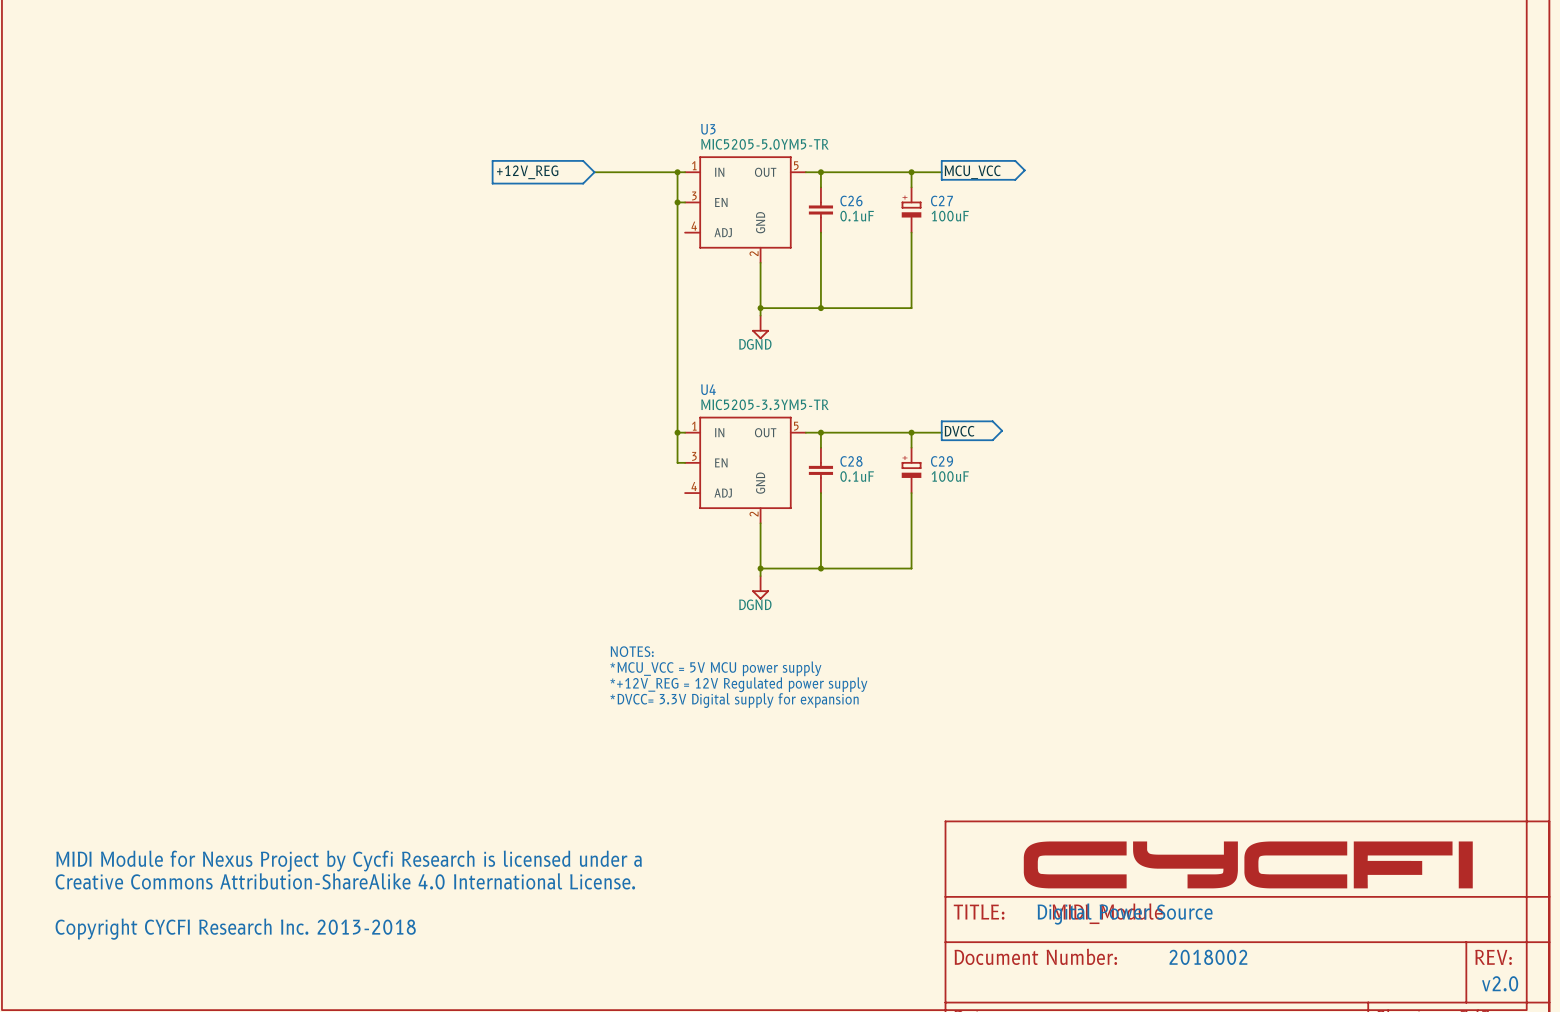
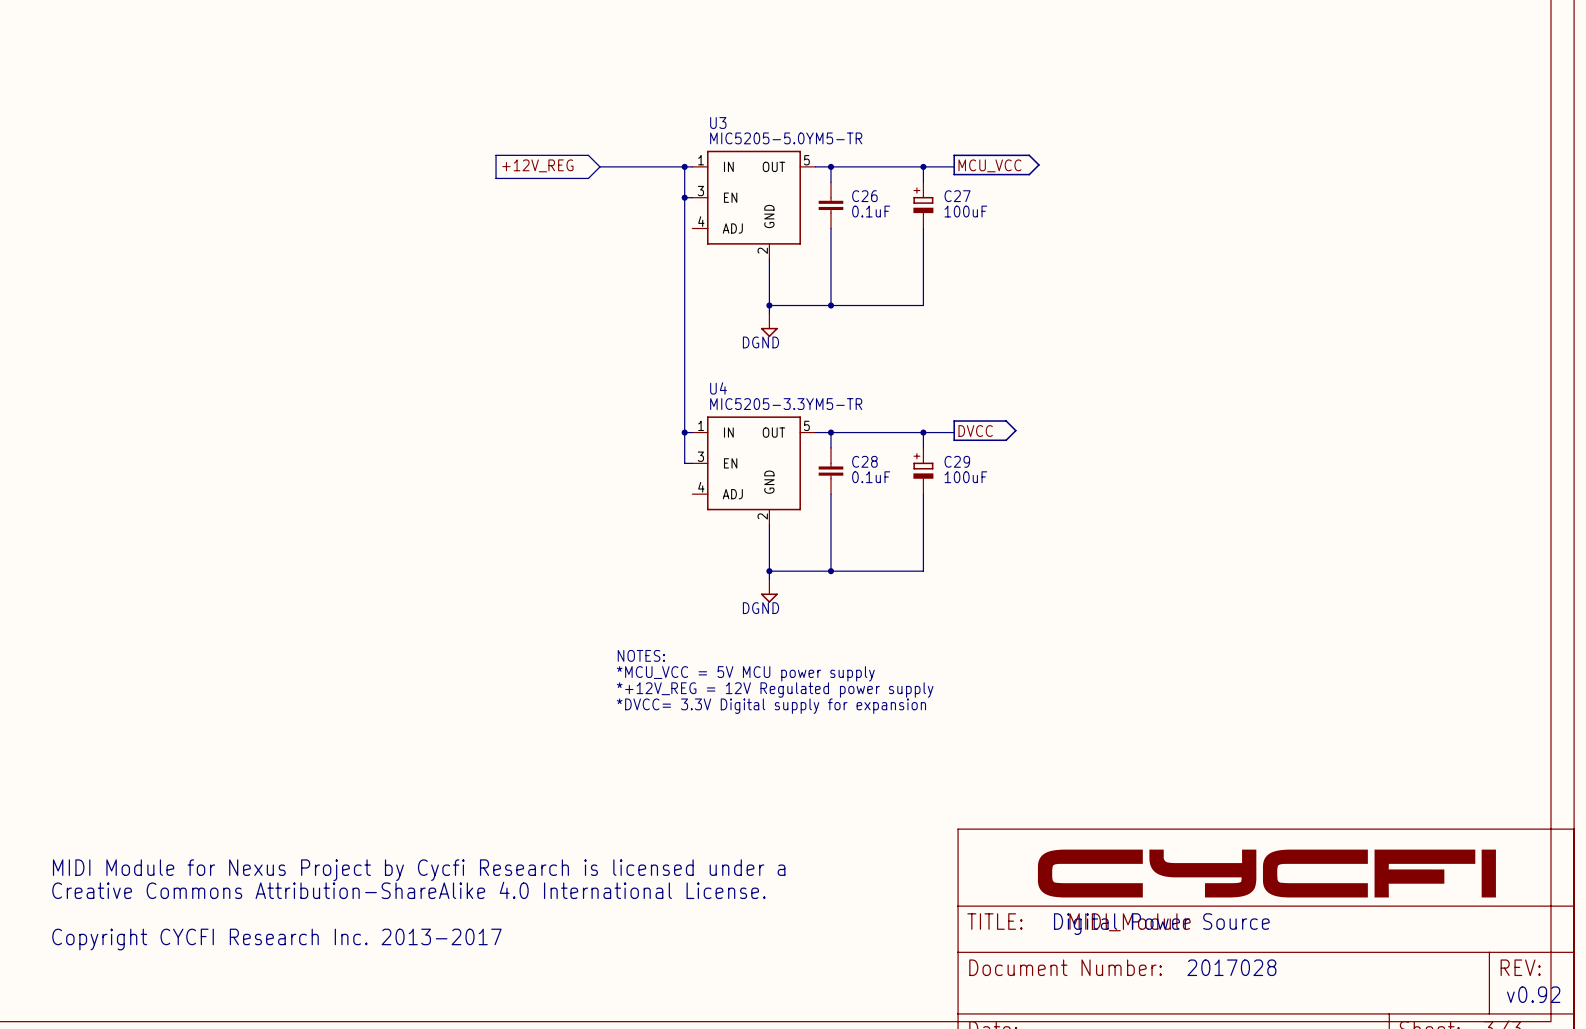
text: Copyright CYCFI Research Inc. 2013-2018 (235, 929) -> Copyright CYCFI Research Inc. 2013-2017 (276, 939)
text: 2018002 (1208, 957) -> 2017028 (1231, 967)
text: v2.0 (1500, 983) -> v0.92 (1533, 994)

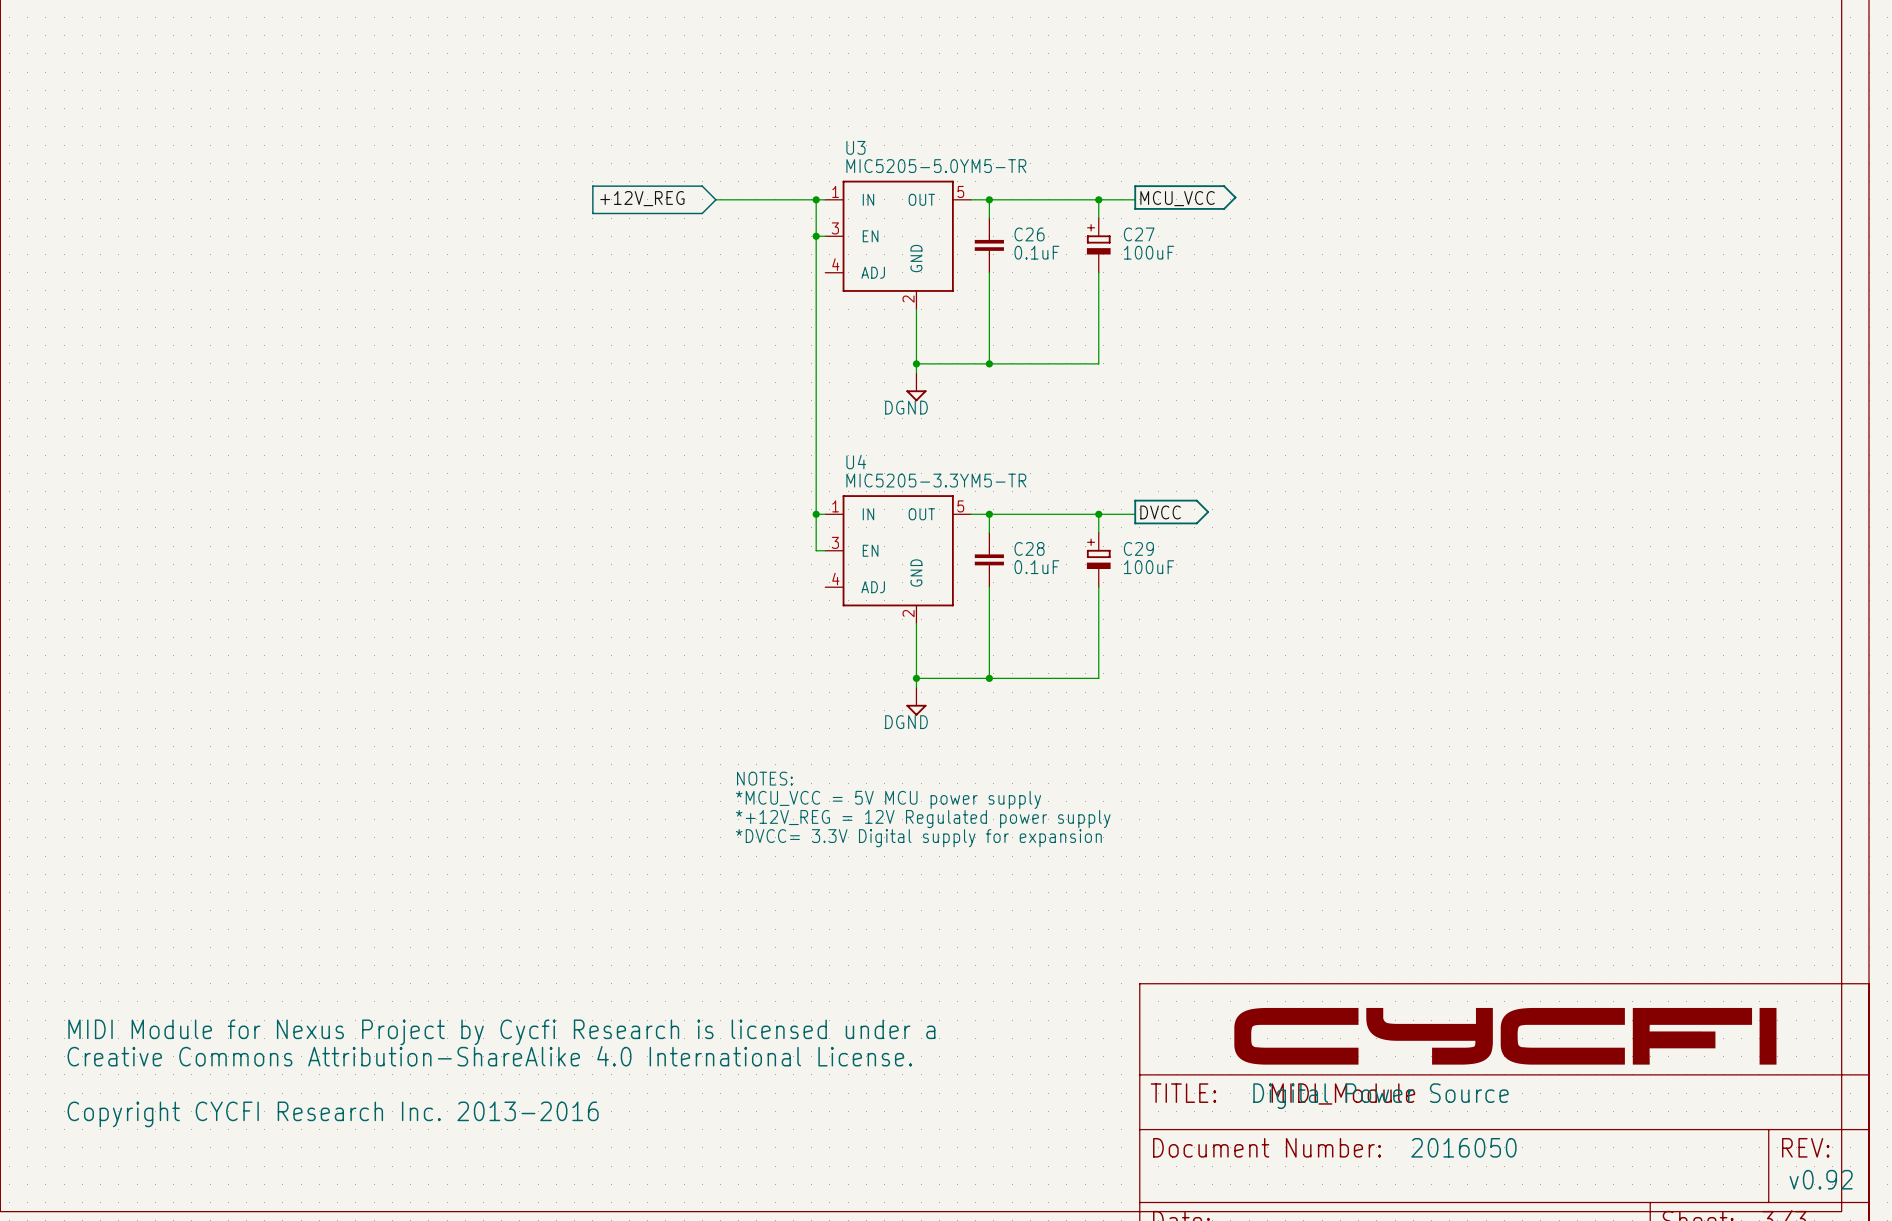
text: Copyright CYCFI Research Inc. 2013-2017 (276, 939) -> Copyright CYCFI Research Inc. 2013-2016 (333, 1114)
text: 2017028 (1231, 967) -> 2016050 (1463, 1147)

